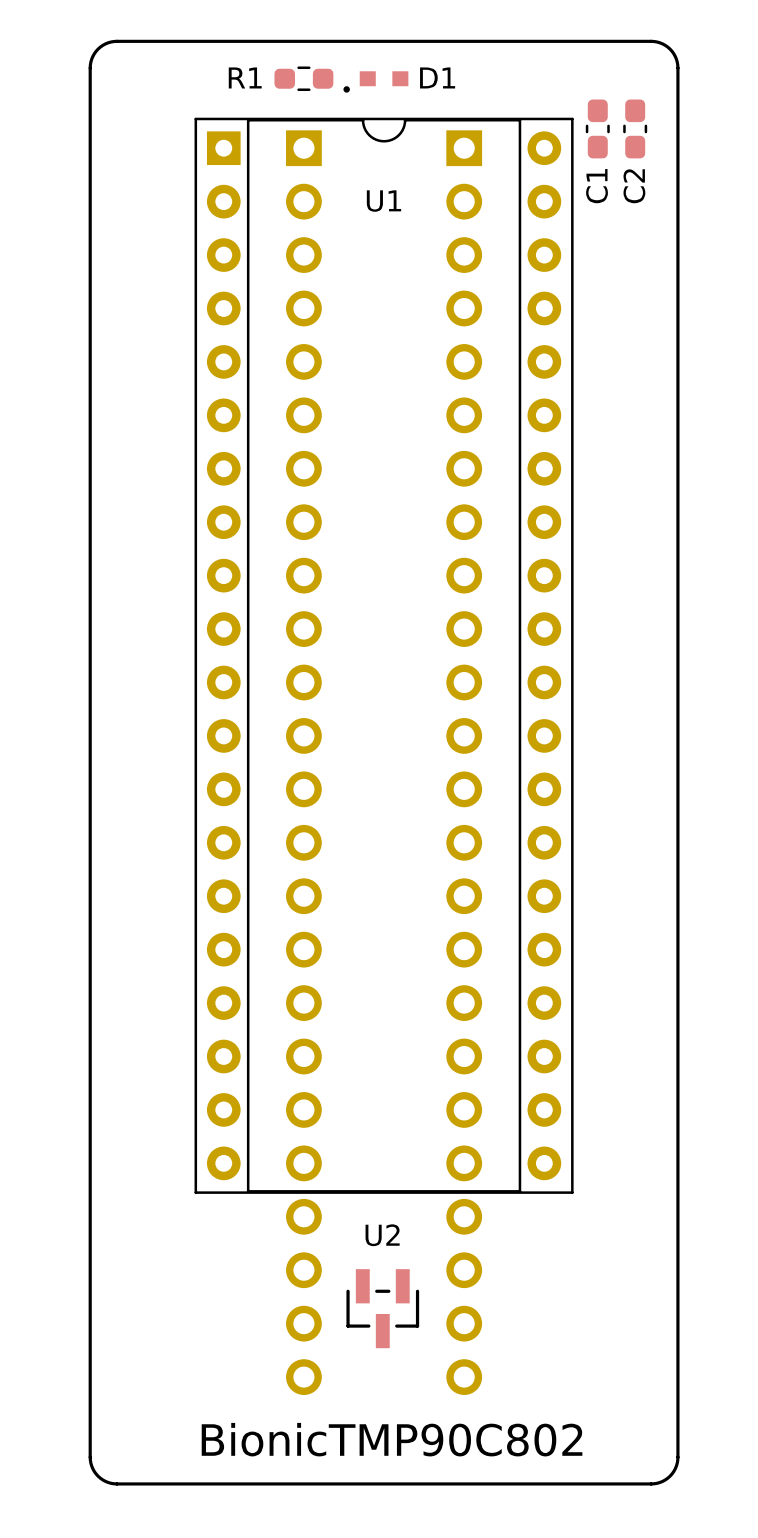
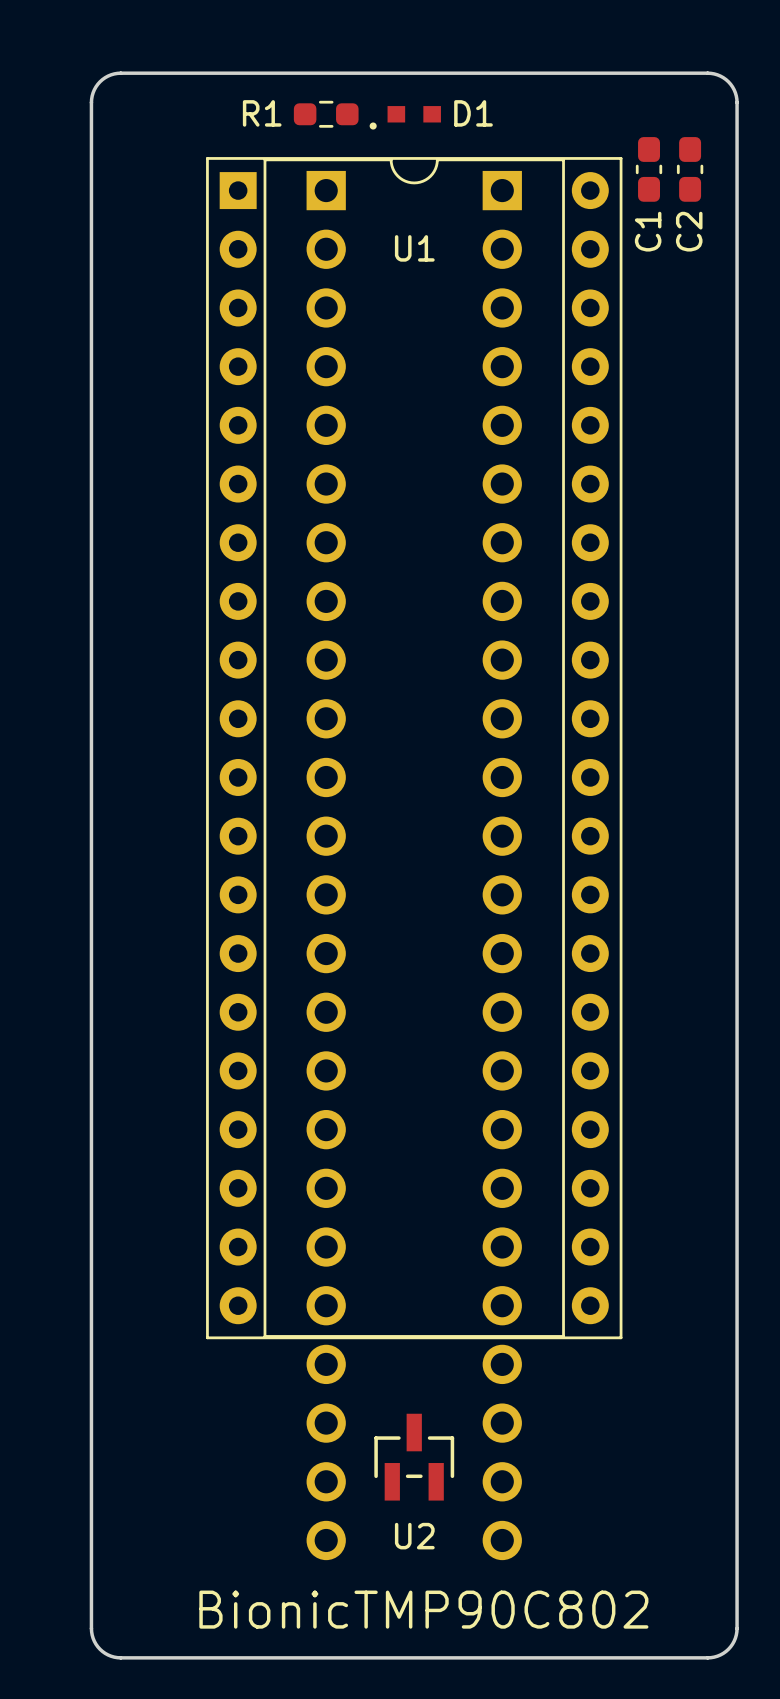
U2 rotation: 0° (382, 1308) -> 180° (414, 1457)

